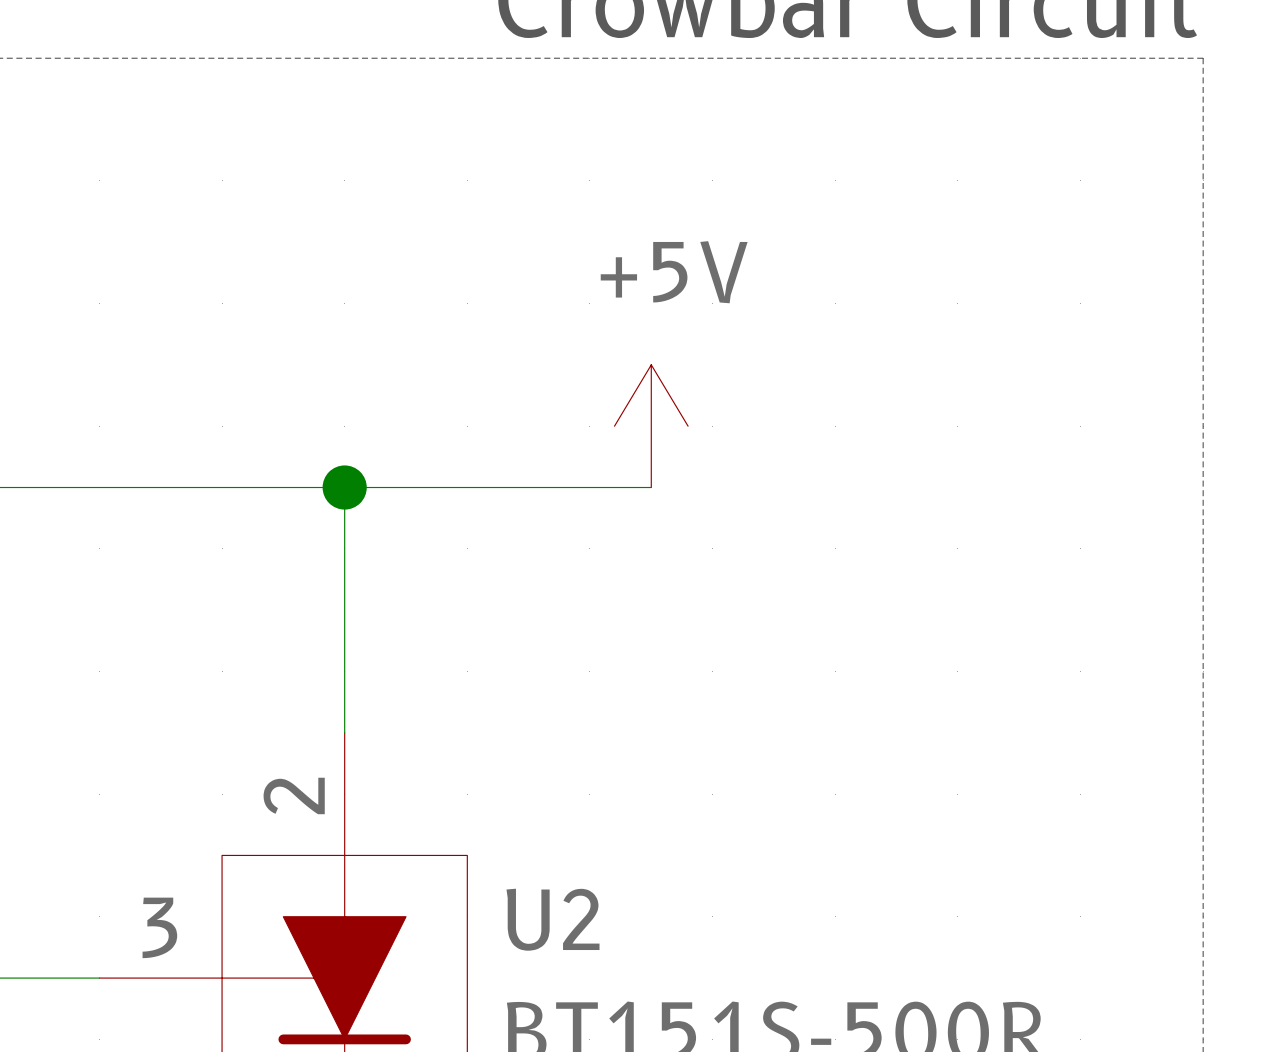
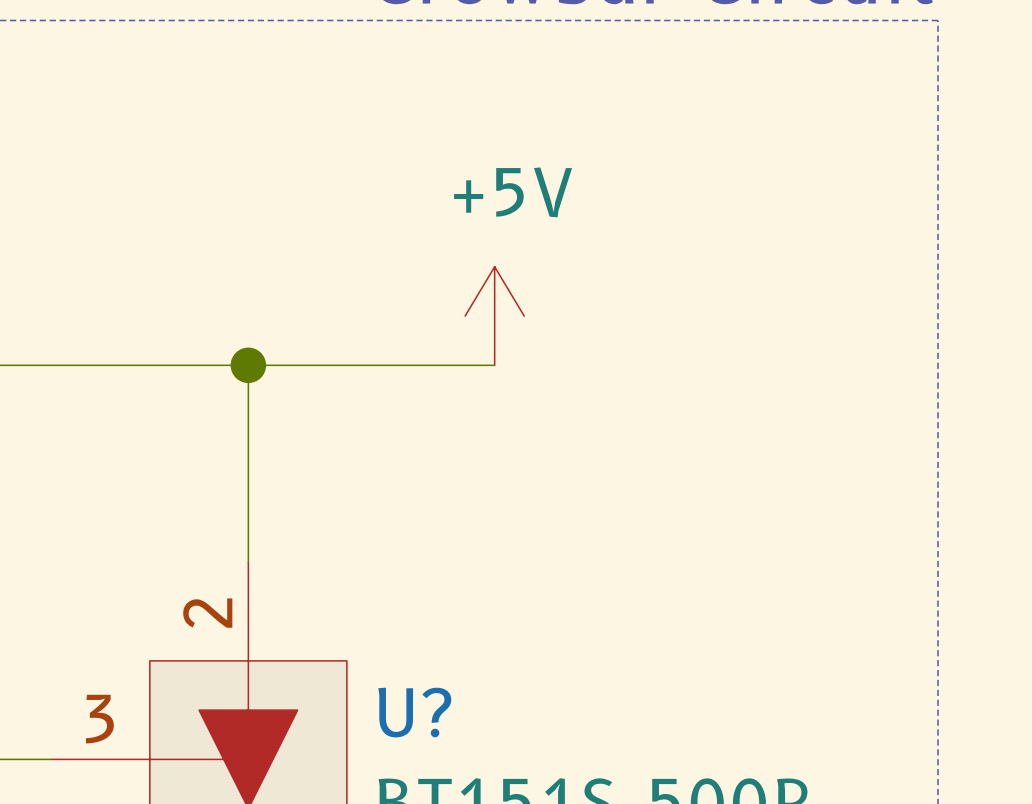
U2 name: U2 (553, 919) -> U? (414, 712)

